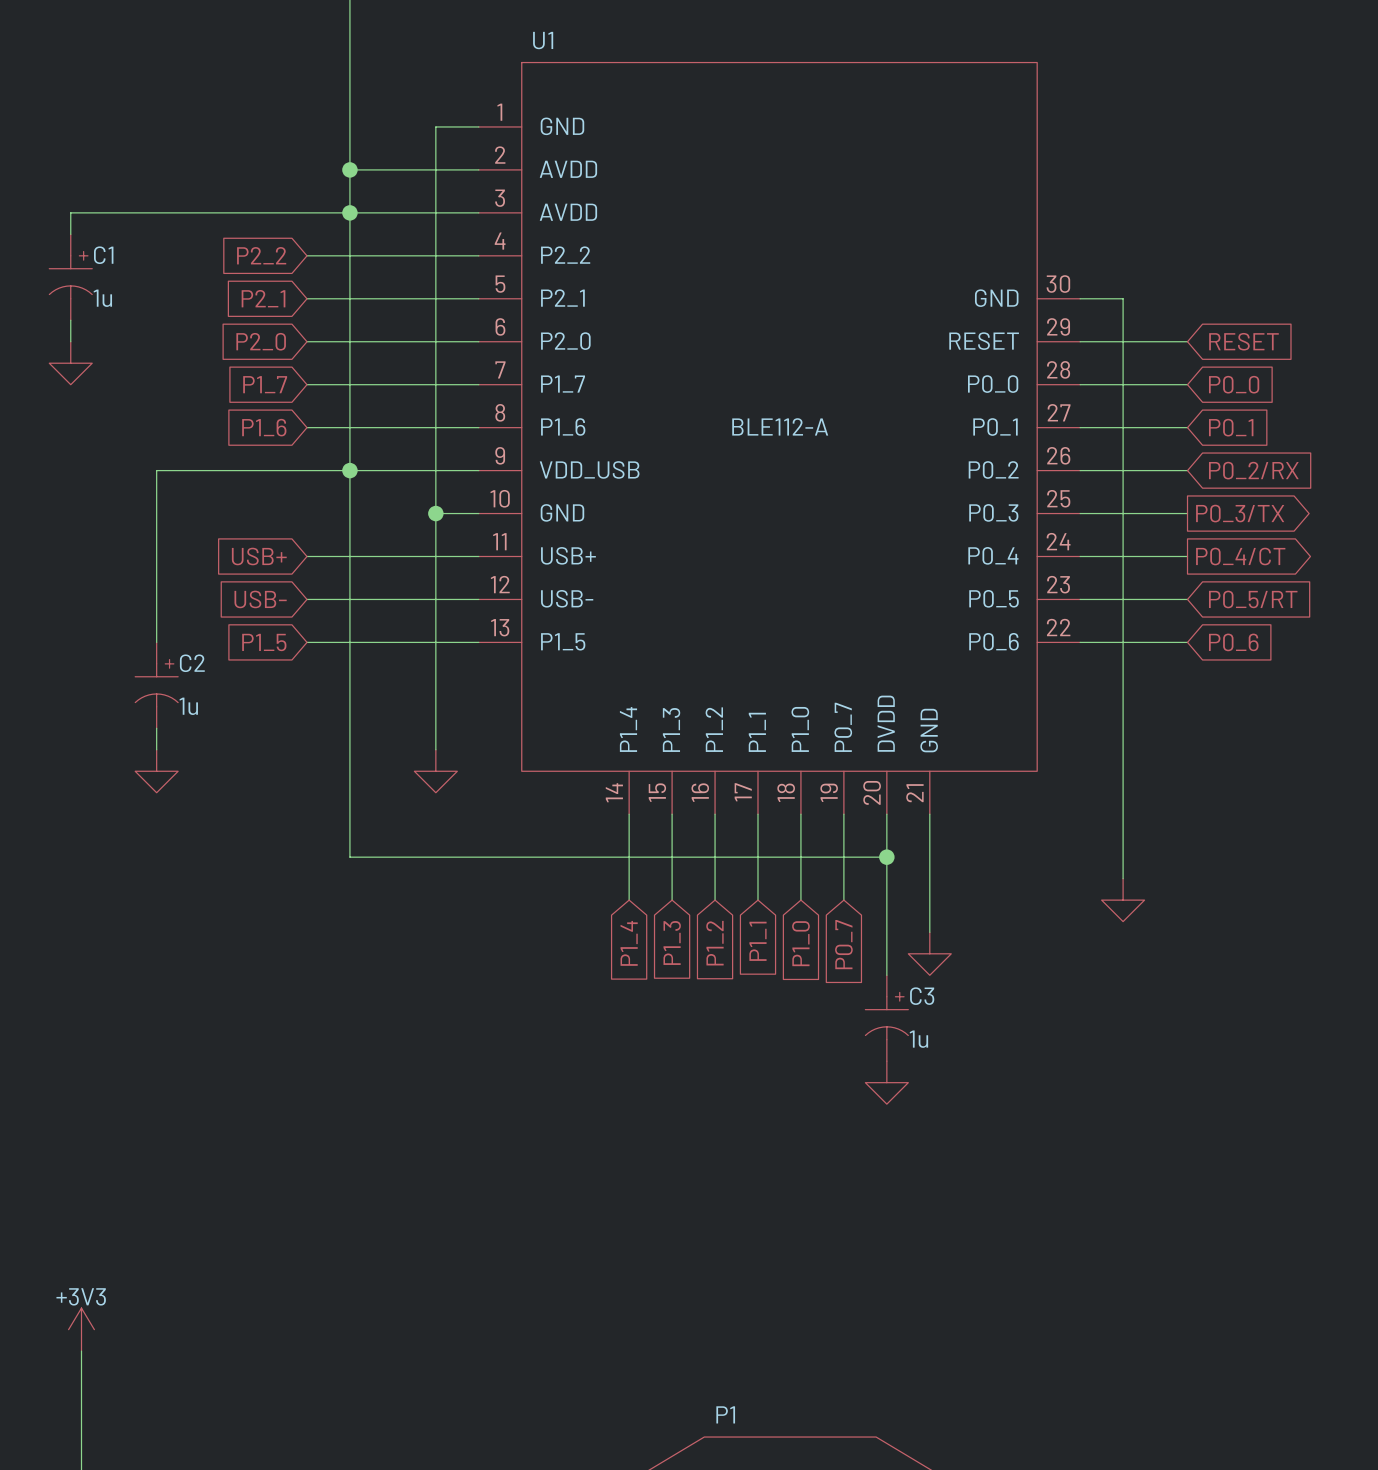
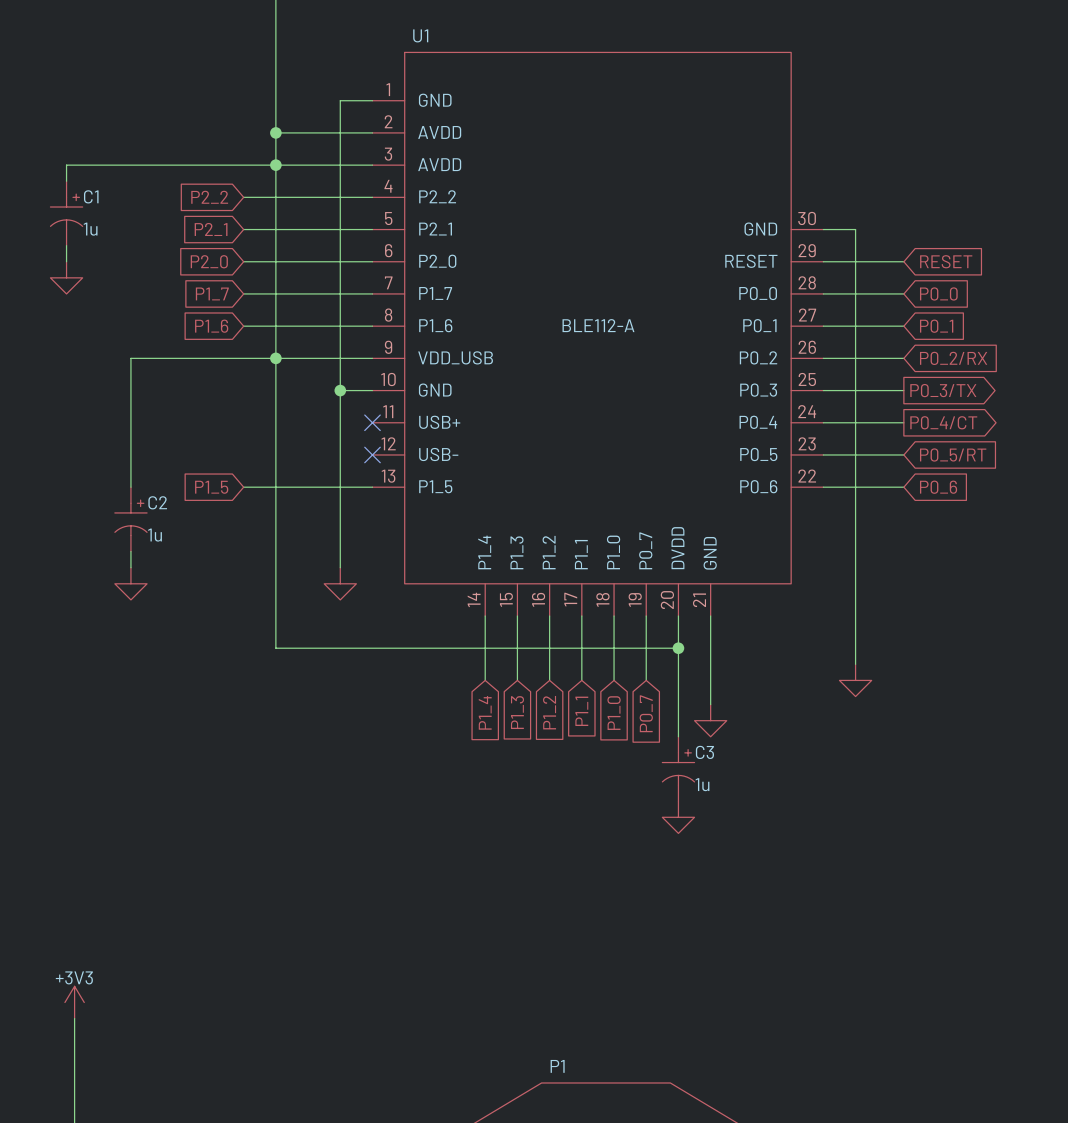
global label: USB+ (259, 556) -> none
wire: (306, 556) (478, 556) -> none
no-connect mark: none -> (372, 422)
global label: USB- (260, 599) -> none
wire: (306, 599) (478, 599) -> none
no-connect mark: none -> (372, 454)

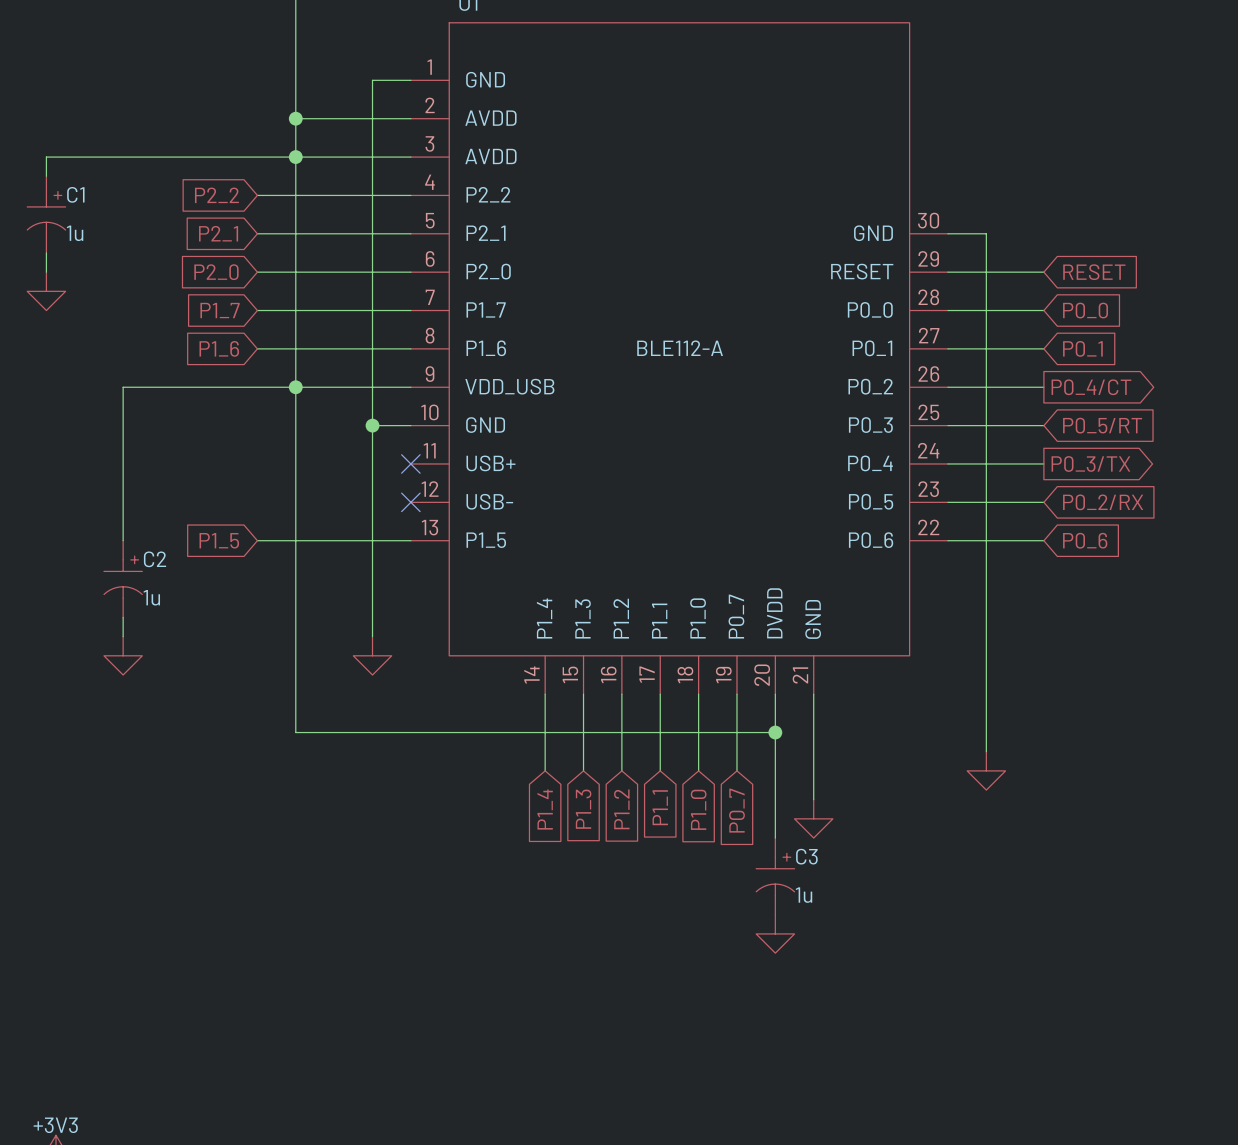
global label shape: input (953, 358) -> output (1091, 387)
global label: P0_2/RX (953, 358) -> P0_4/CT (1091, 387)
global label shape: output (943, 390) -> input (1102, 425)
global label: P0_3/TX (943, 390) -> P0_5/RT (1102, 425)
global label: P0_4/CT (943, 422) -> P0_3/TX (1090, 463)
global label: P0_5/RT (953, 454) -> P0_2/RX (1103, 502)

